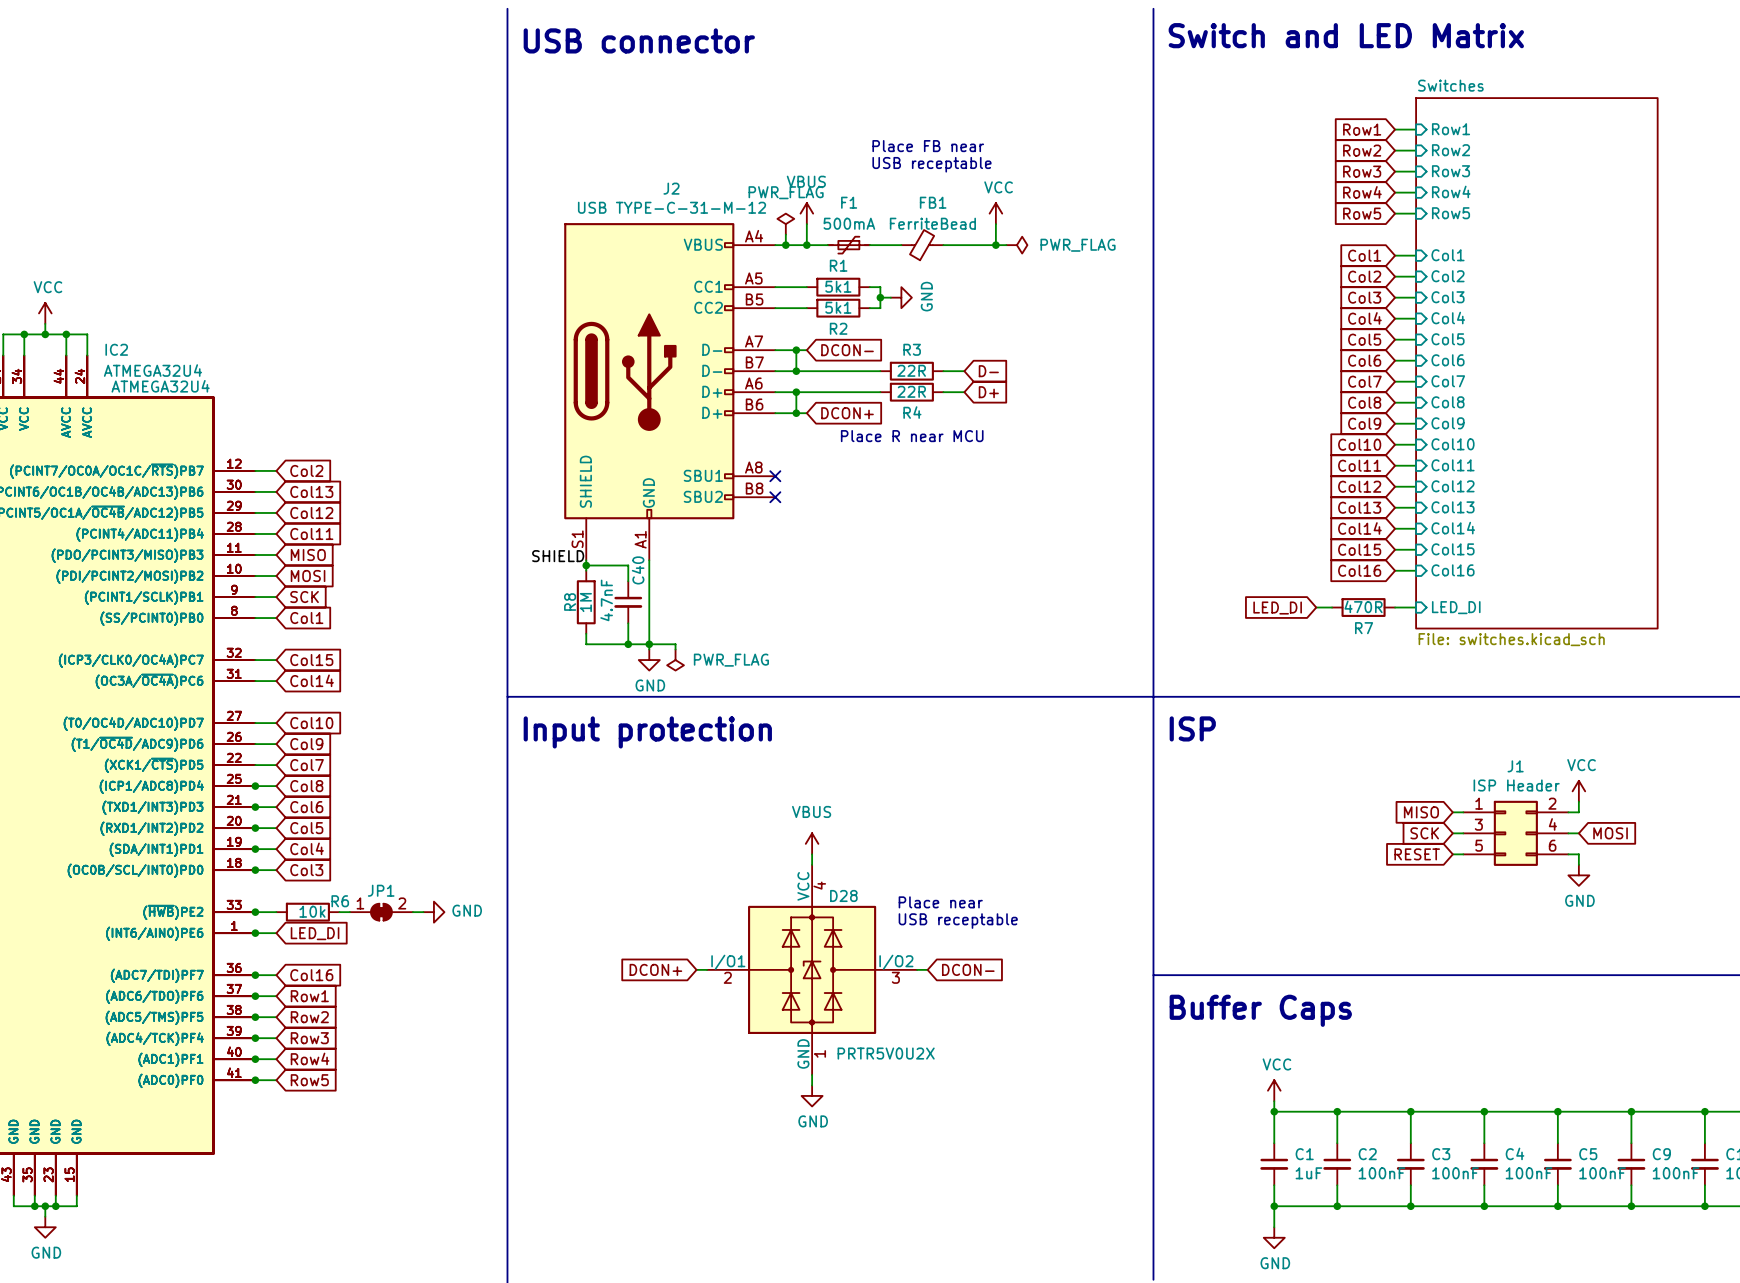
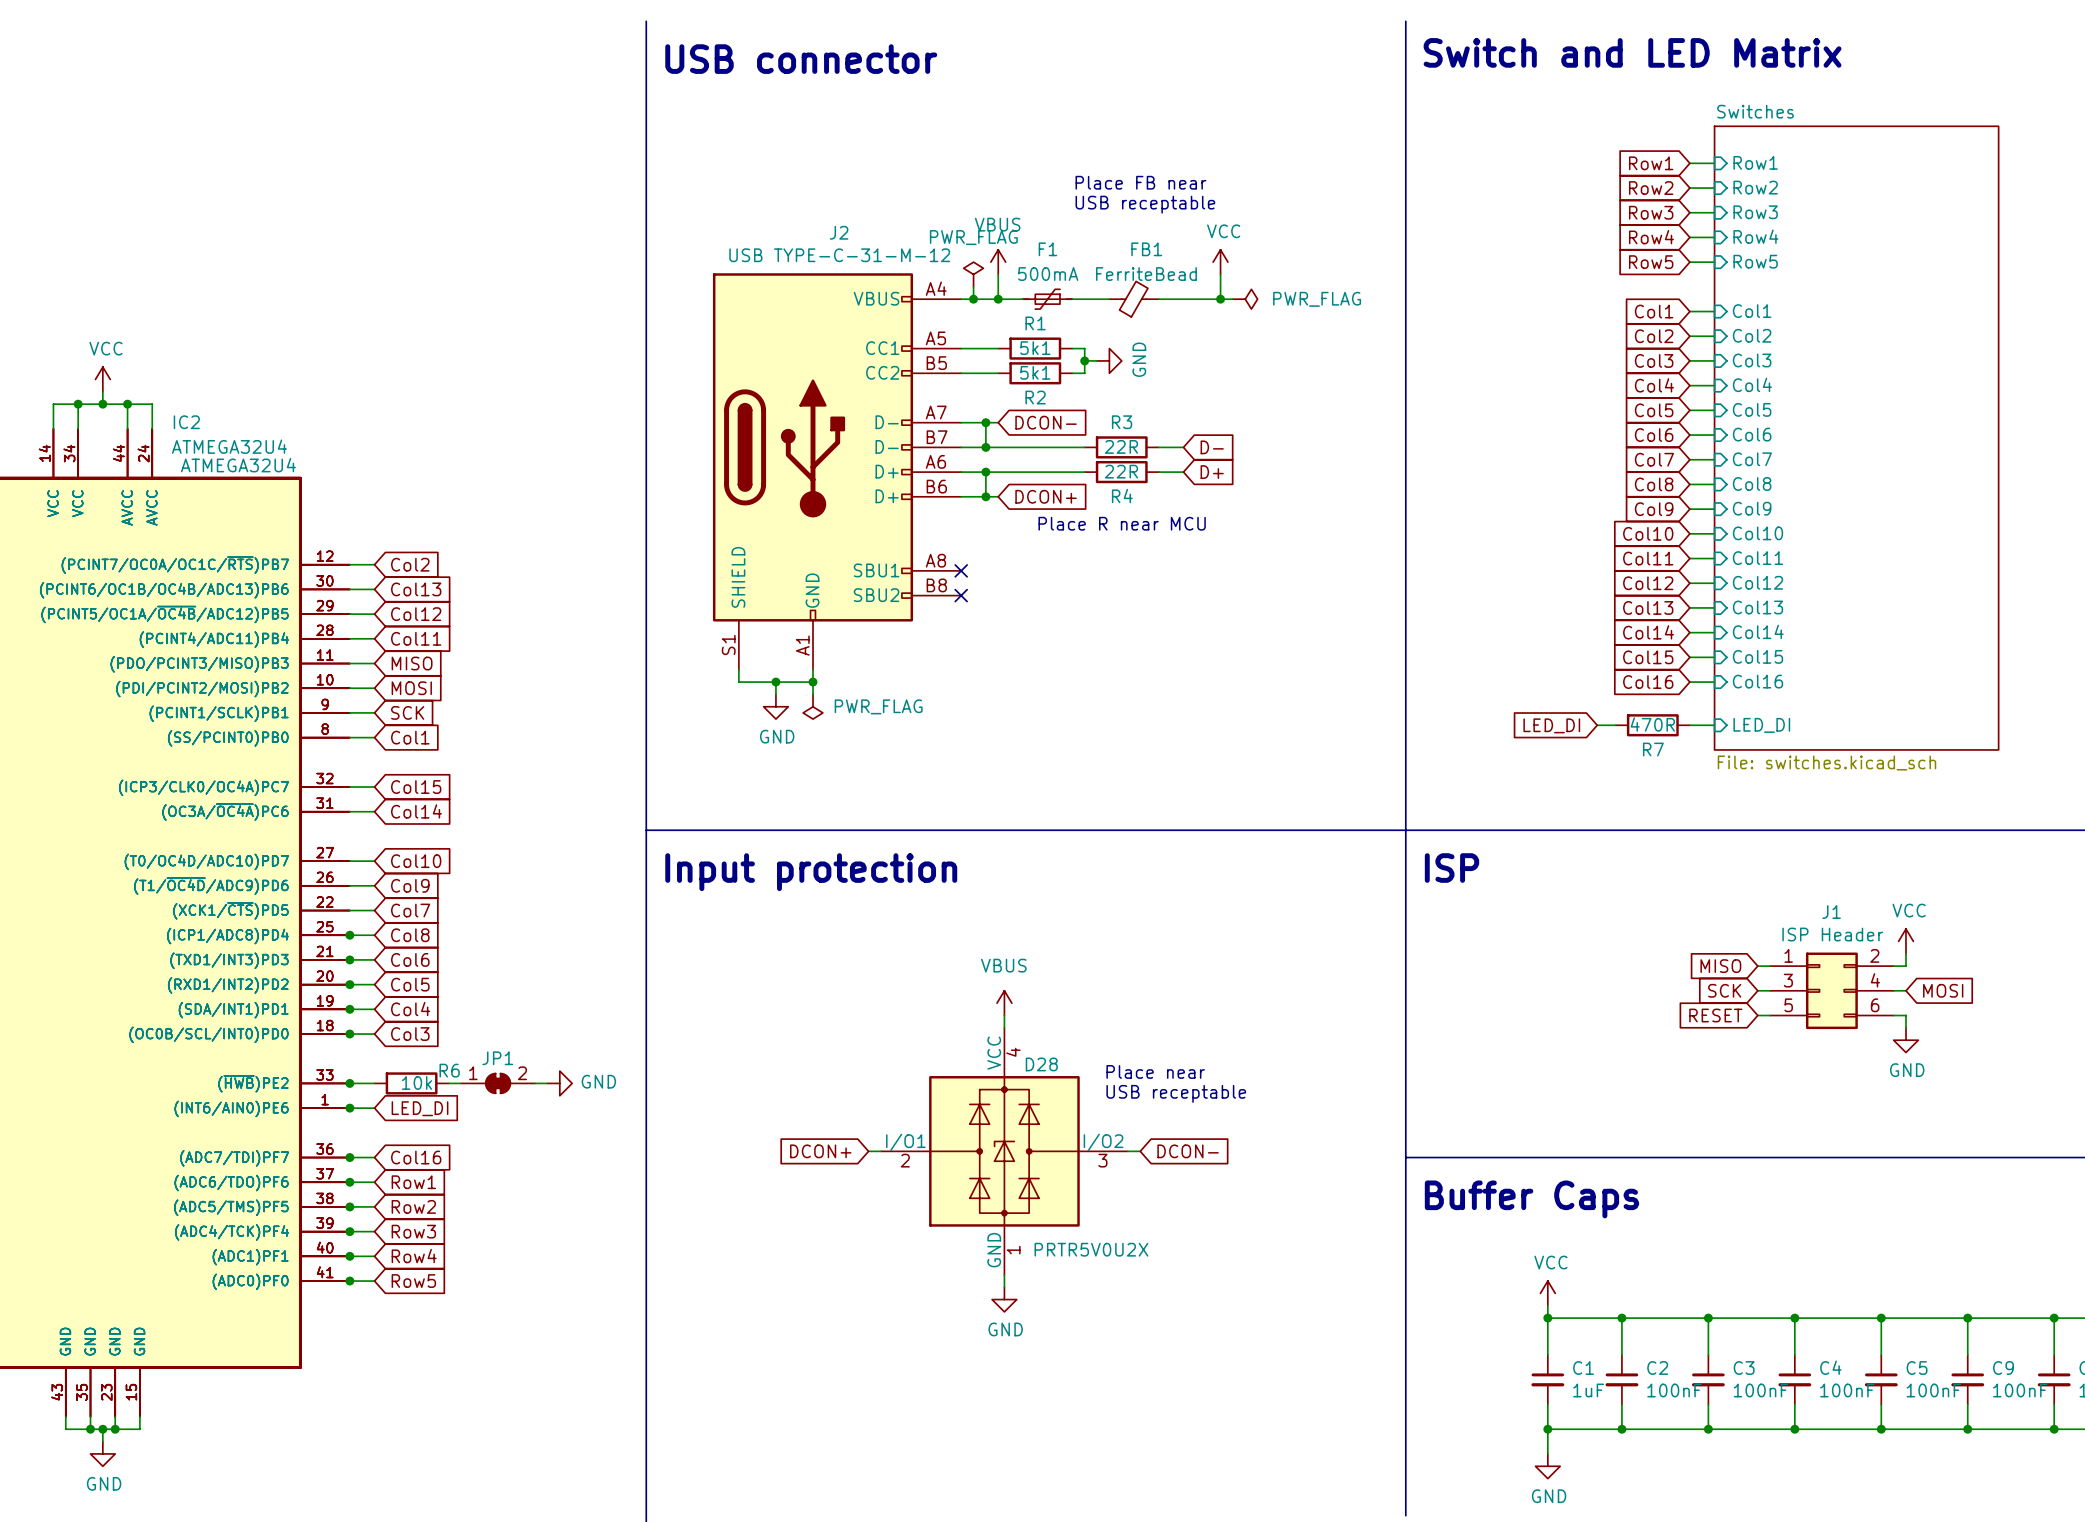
label: SHIELD (558, 556) -> none
wire: (586, 565) (628, 565) (628, 581) -> none
junction: (586, 565) -> none
wire: none -> (738, 682) (813, 682)
wire: none -> (775, 682) (775, 694)
junction: none -> (775, 682)
junction: none -> (813, 682)
wire: (649, 581) (649, 649) -> none
R8: 1M (586, 602) -> none
C40: 4.7nF (628, 602) -> none
wire: (628, 623) (628, 644) -> none
wire: (586, 633) (586, 644) (675, 644) (675, 649) -> none
junction: (628, 644) -> none
junction: (649, 644) -> none
power symbol position: GND (649, 660) -> GND (775, 706)
power symbol position: PWR_FLAG (675, 660) -> PWR_FLAG (813, 706)

